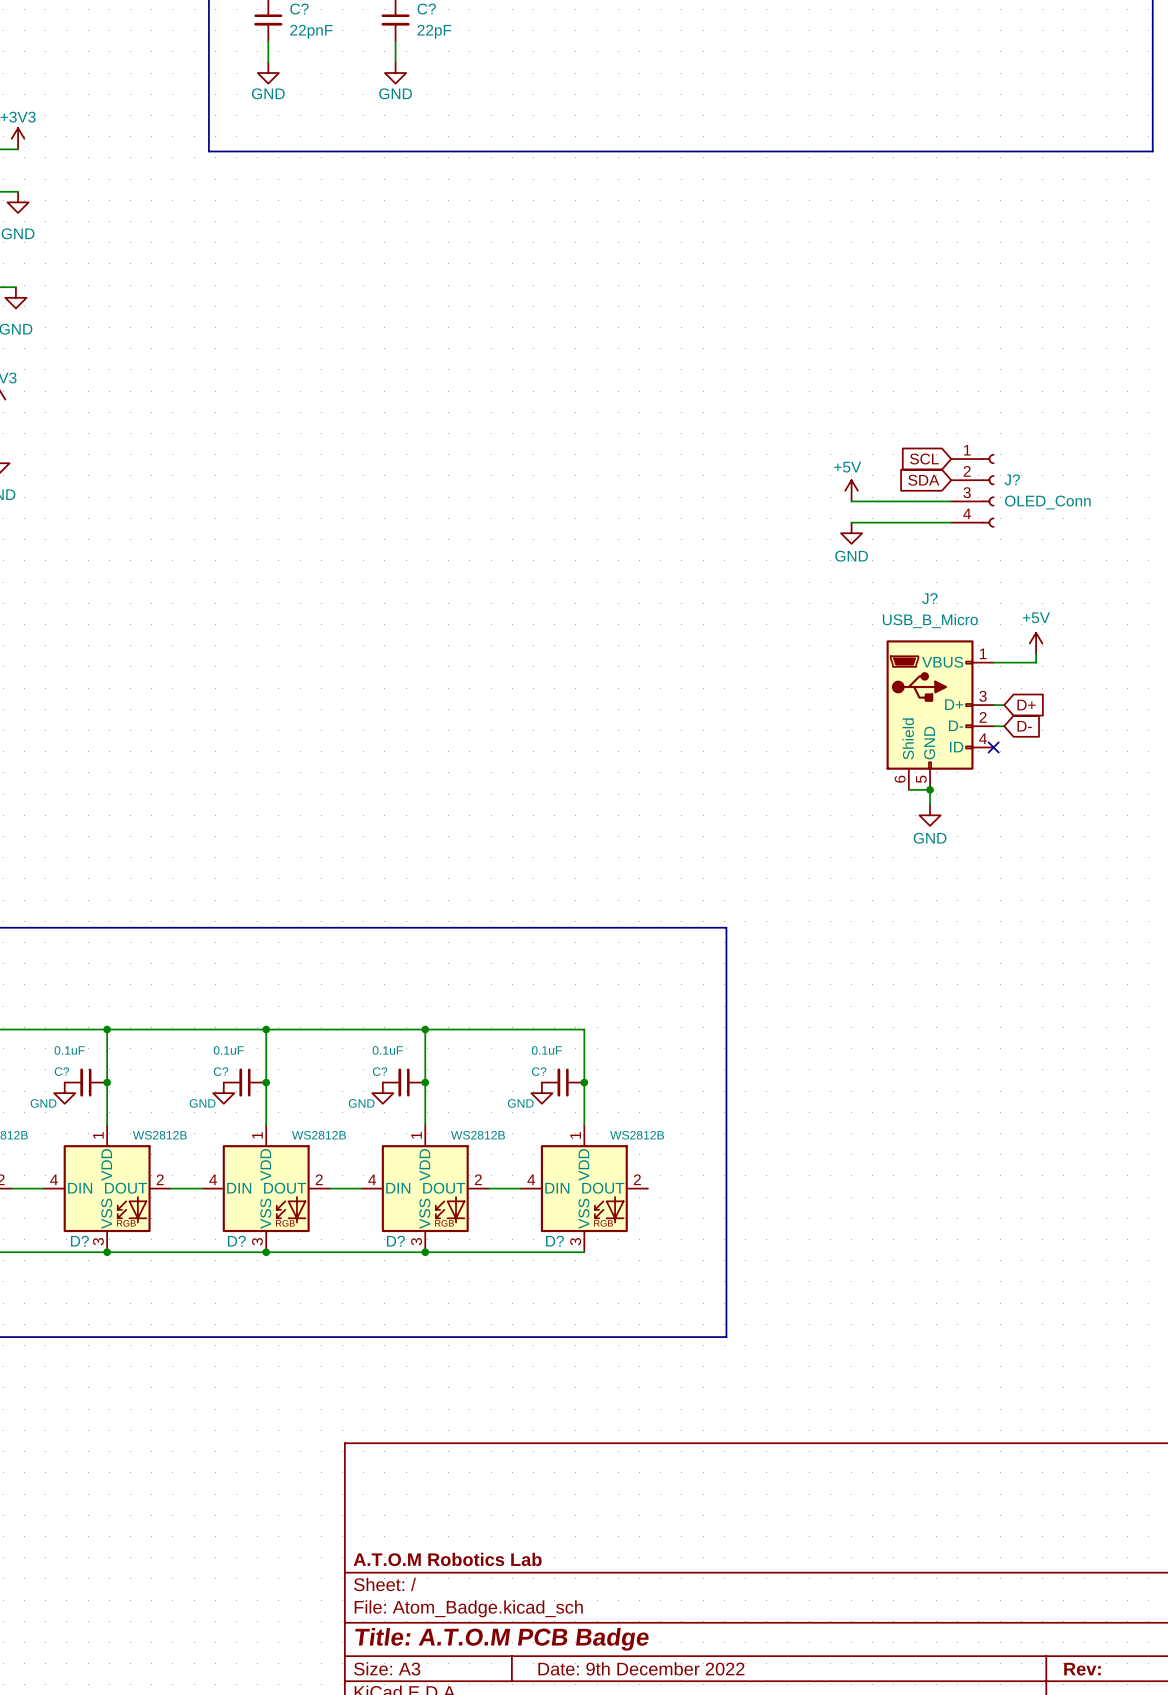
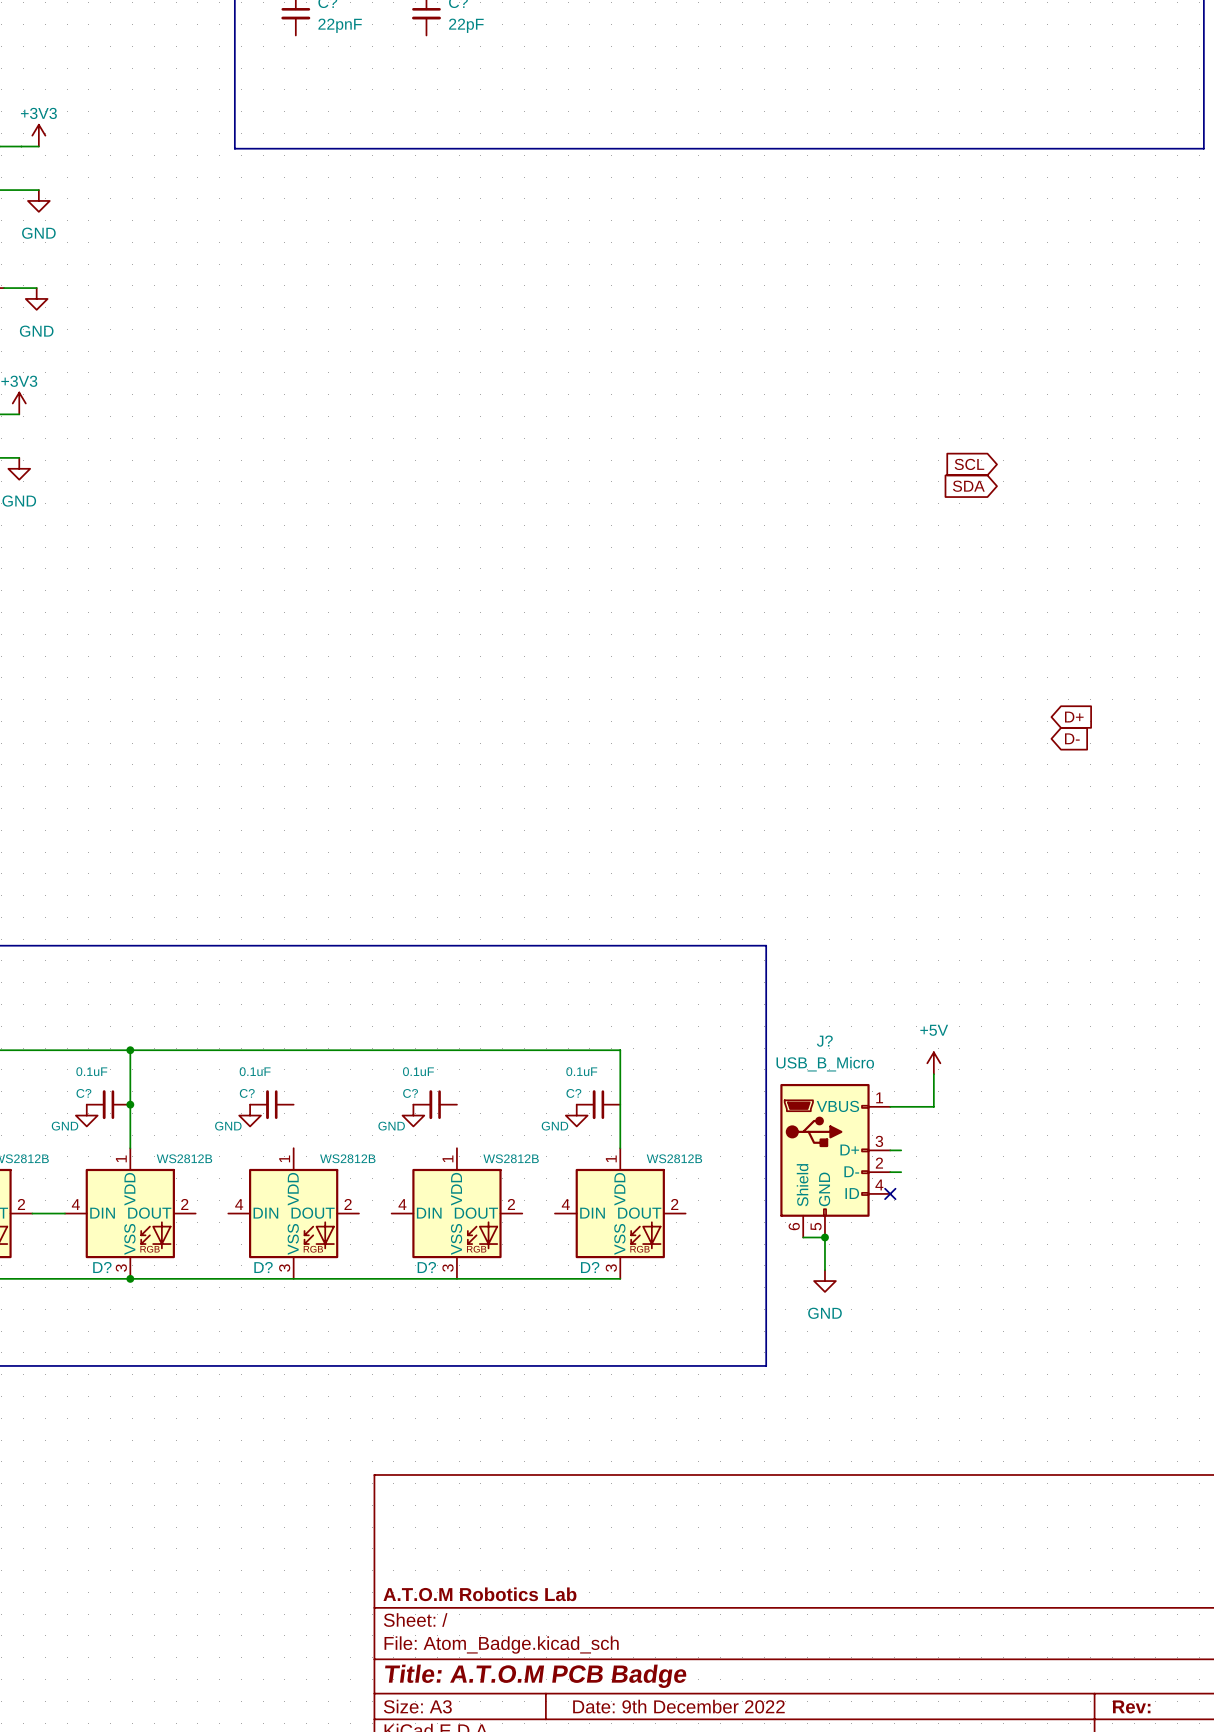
wire: (268, 41) (268, 62) -> none
wire: (395, 41) (395, 62) -> none
power symbol: GND (268, 73) -> none
power symbol: GND (395, 73) -> none
power symbol: +5V (851, 490) -> none
J?: OLED_Conn (972, 490) -> none
wire: (851, 501) (951, 501) -> none
wire: (851, 522) (951, 522) -> none
power symbol: GND (851, 533) -> none
power symbol: +5V (1036, 643) -> none
wire: (1036, 654) (1036, 662) (993, 662) -> none
wire: (993, 705) (1004, 705) -> none
J?: USB_B_Micro (940, 715) -> none
wire: (993, 726) (1004, 726) -> none
no-connect mark: (993, 747) -> none
wire: (908, 789) (930, 789) (930, 804) -> none
junction: (930, 789) -> none
power symbol: GND (930, 815) -> none
wire: (266, 1029) (266, 1124) -> none
junction: (266, 1029) -> none
wire: (425, 1029) (425, 1124) -> none
junction: (425, 1029) -> none
power symbol: none -> +5V (933, 1063)
wire: none -> (933, 1074) (933, 1106) (890, 1106)
junction: (266, 1082) -> none
junction: (425, 1082) -> none
junction: (584, 1082) -> none
wire: none -> (890, 1150) (901, 1150)
J?: none -> USB_B_Micro (835, 1160)
wire: none -> (890, 1172) (901, 1172)
no-connect mark: none -> (890, 1193)
wire: (170, 1188) (202, 1188) -> none
wire: (329, 1188) (361, 1188) -> none
wire: (488, 1188) (520, 1188) -> none
wire: none -> (803, 1237) (824, 1237) (824, 1270)
junction: none -> (824, 1237)
junction: (266, 1252) -> none
junction: (425, 1252) -> none
power symbol: none -> GND (824, 1281)

